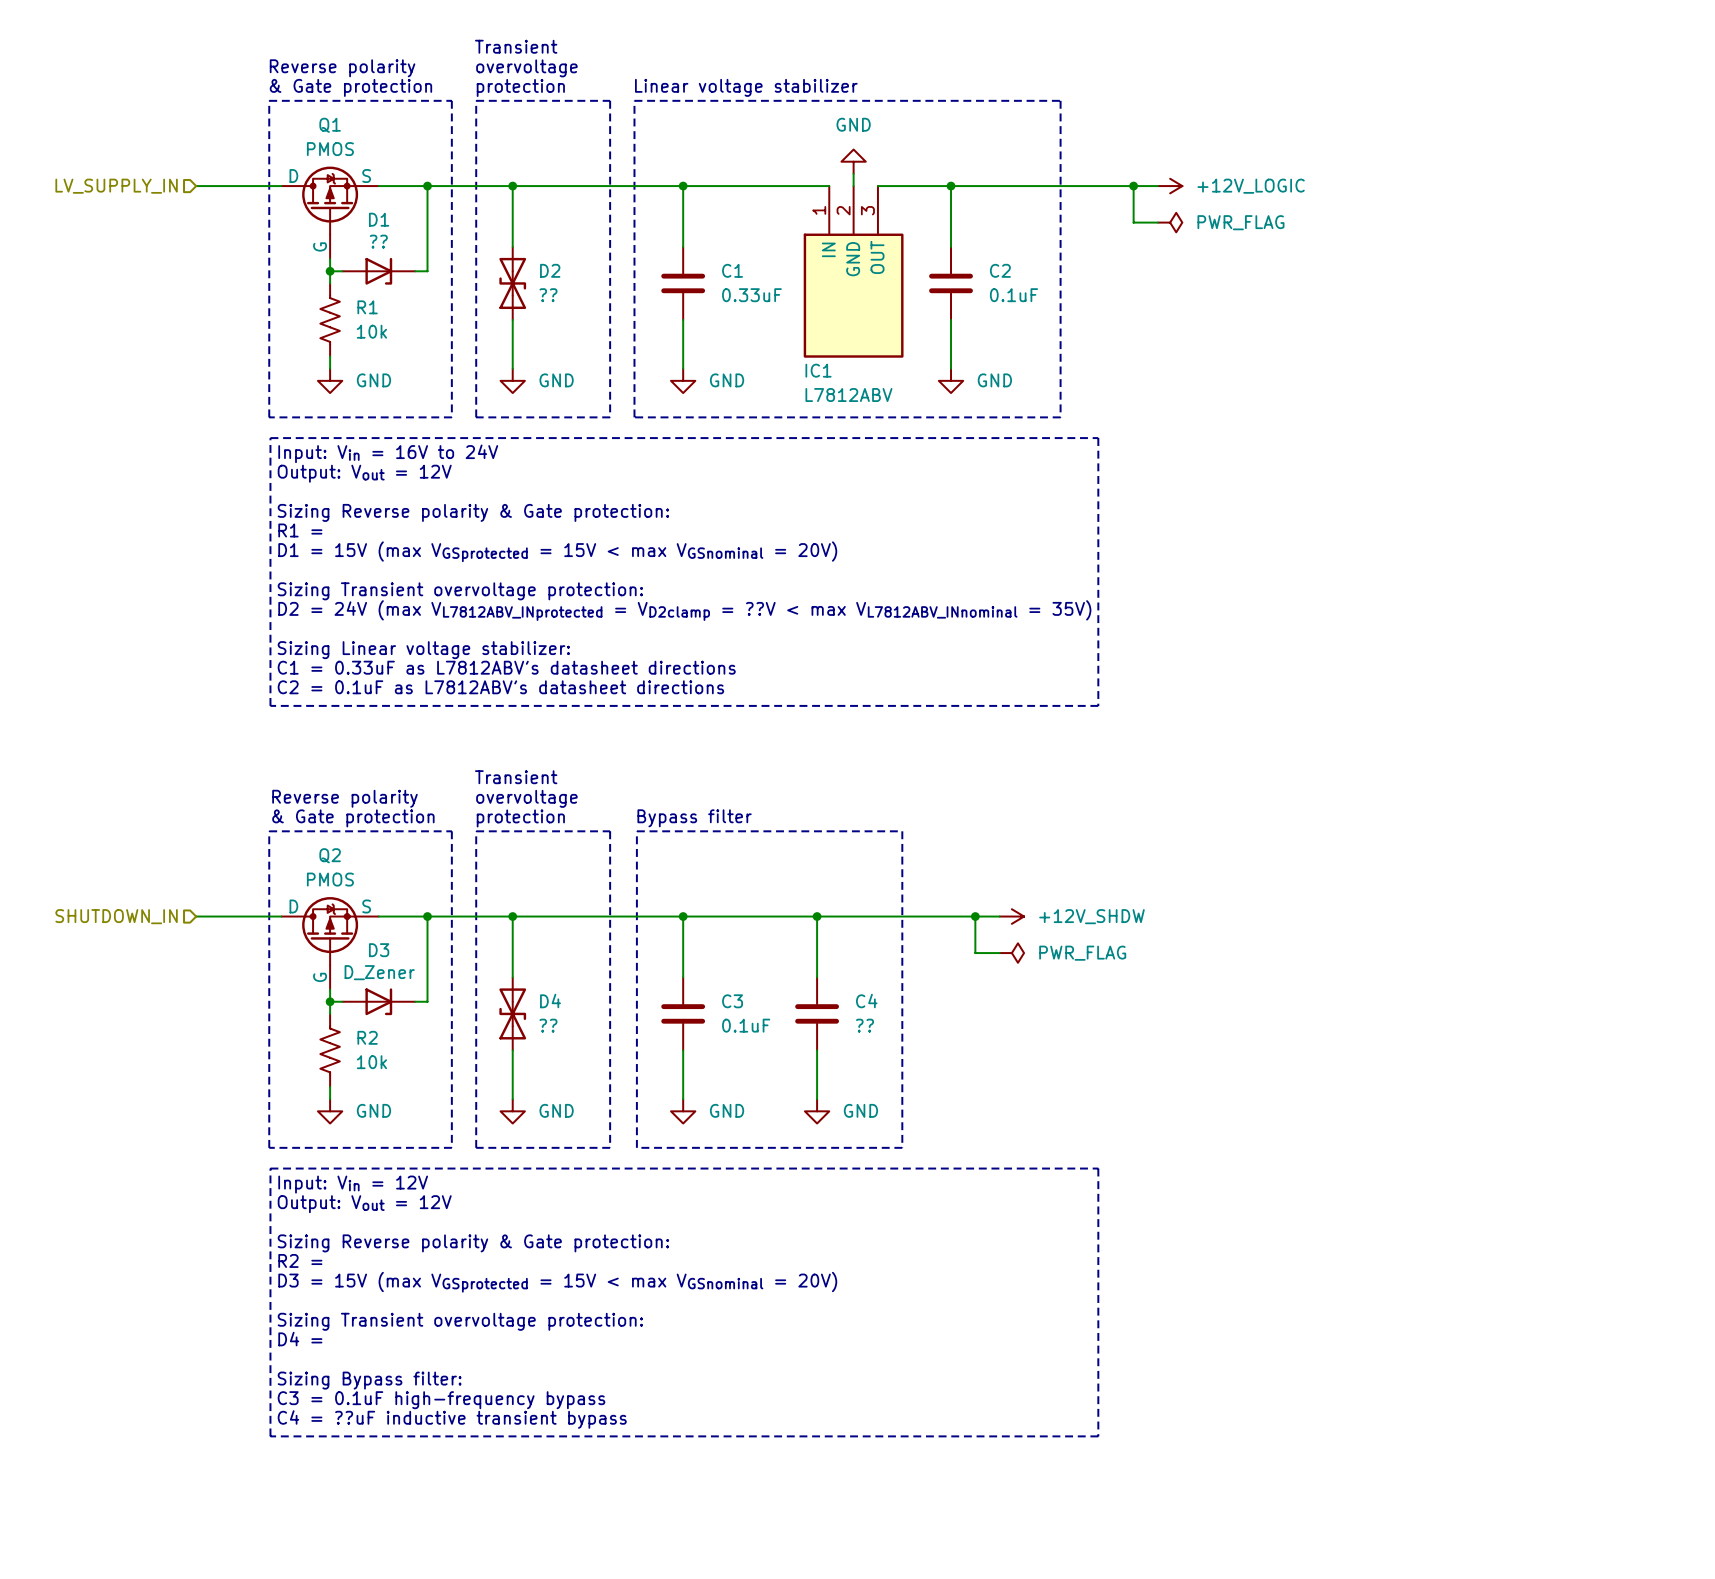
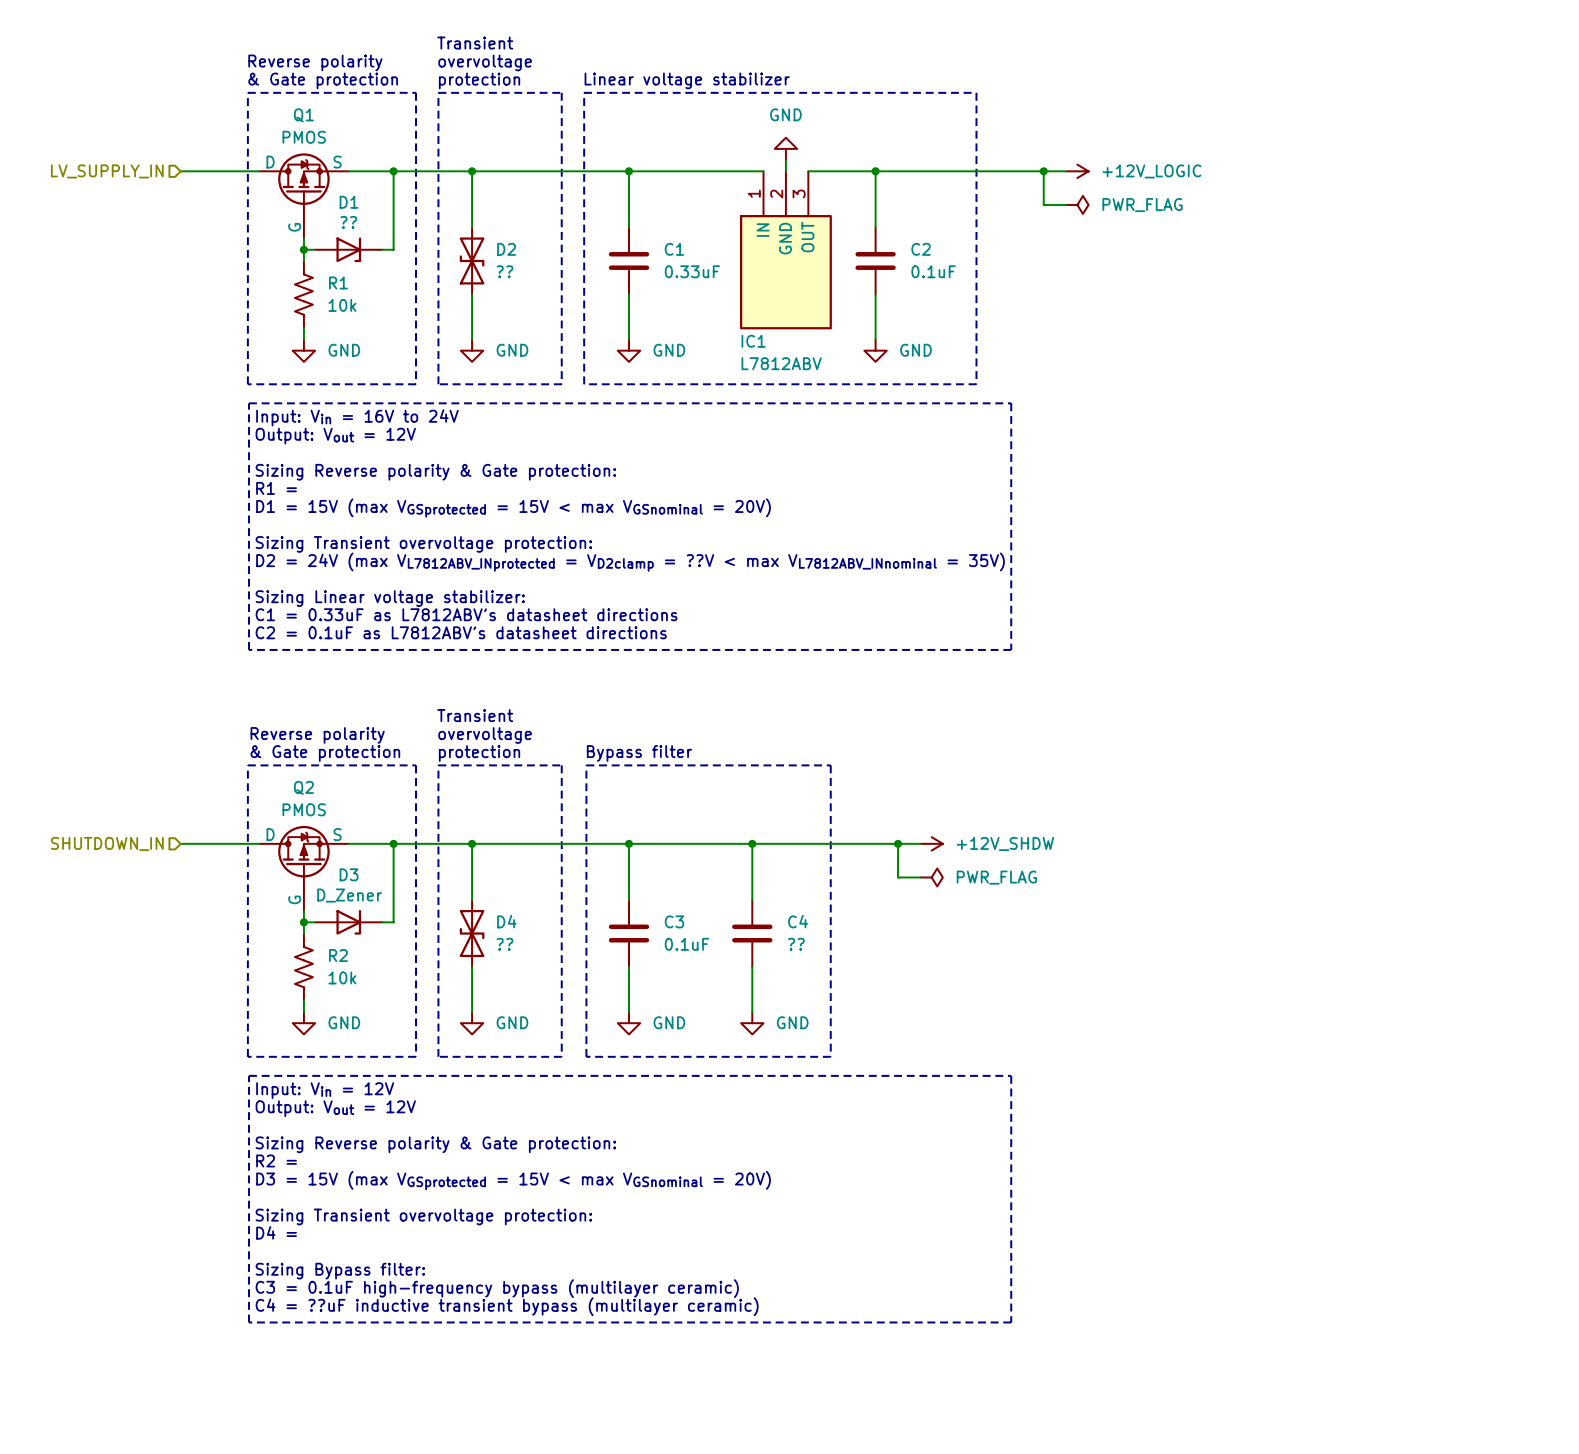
text: C3 = 0.1uF high-frequency bypass (441, 1400) -> C3 = 0.1uF high-frequency bypass (multilayer ceramic) (497, 1288)
text: C4 = ??uF inductive transient bypass (452, 1419) -> C4 = ??uF inductive transient bypass (multilayer ceramic) (507, 1306)

